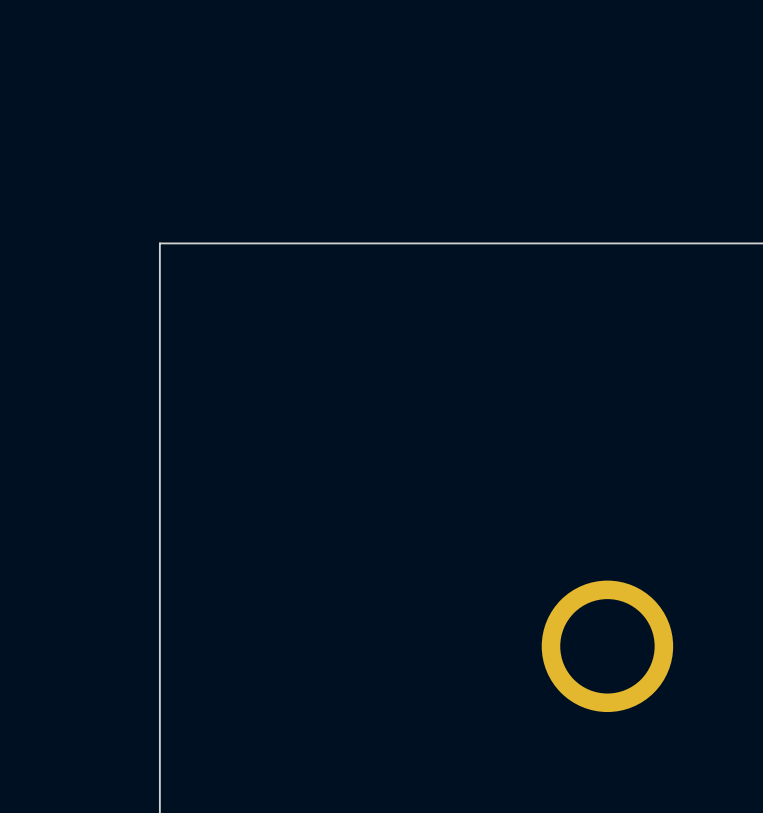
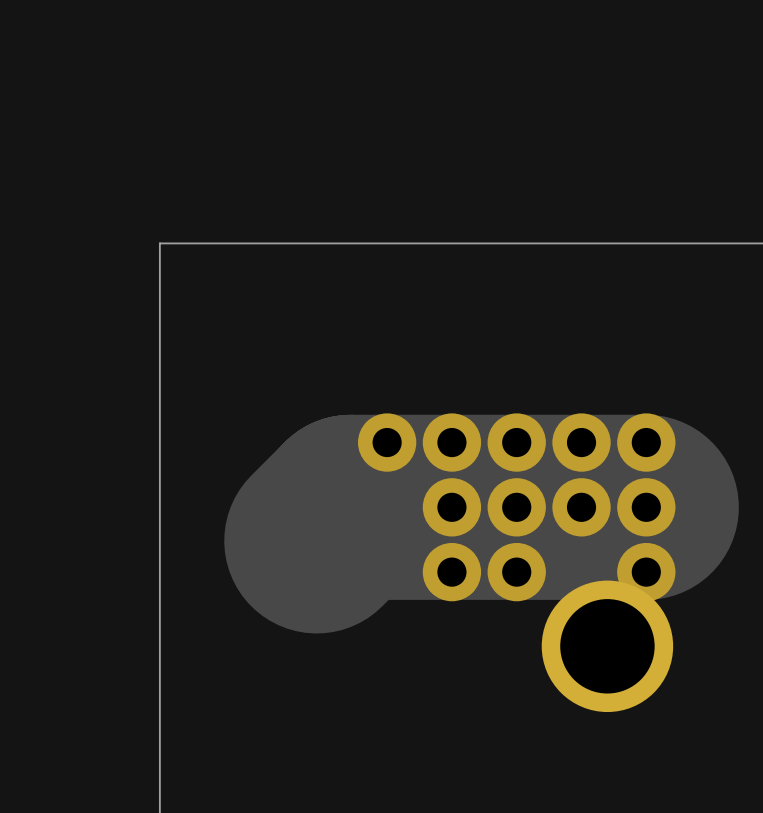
via: none -> (387, 442)
via: none -> (451, 442)
via: none -> (516, 442)
via: none -> (581, 442)
via: none -> (646, 442)
via: none -> (451, 507)
via: none -> (516, 507)
via: none -> (581, 507)
track: none -> (646, 507) (350, 507) (316, 540)
via: none -> (646, 507)
via: none -> (451, 572)
via: none -> (516, 572)
via: none -> (646, 572)

